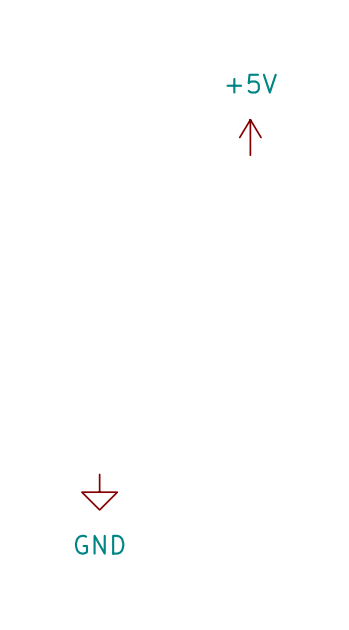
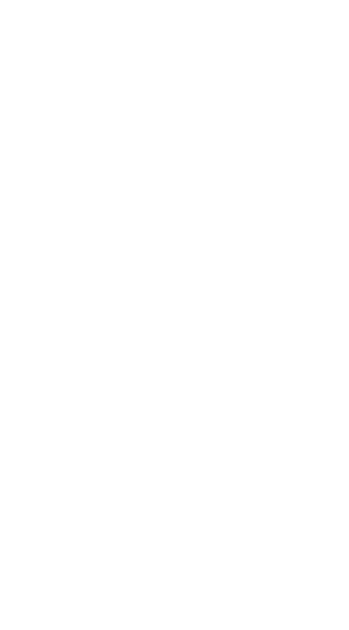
power symbol: +5V (250, 137) -> none
power symbol: GND (99, 492) -> none

